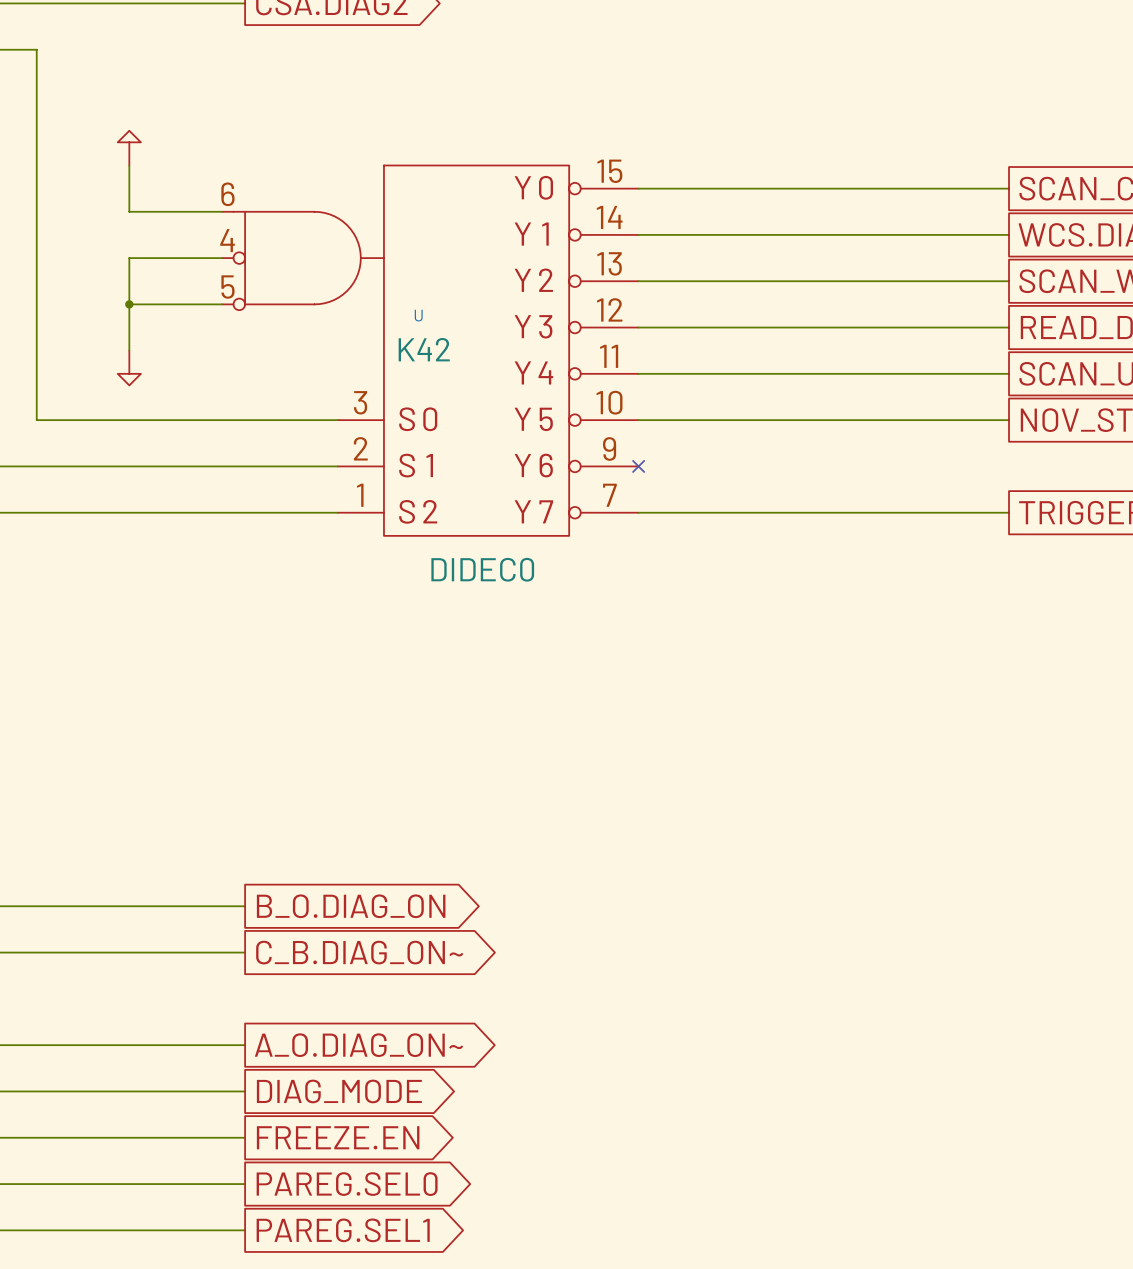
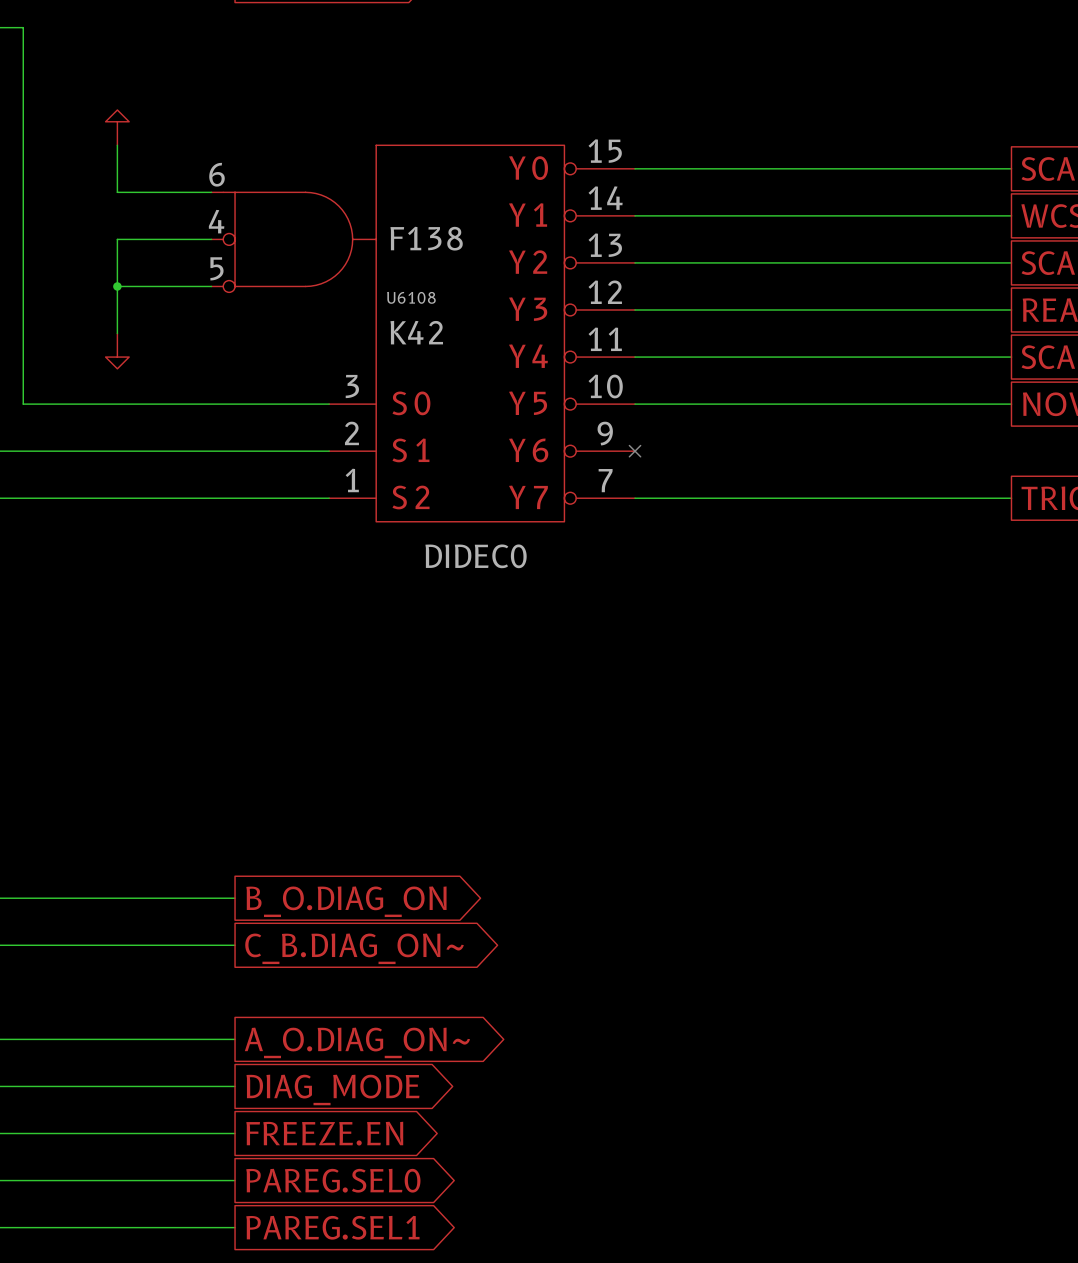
U value: none -> F138 (426, 238)
U name: U (418, 315) -> U6108 (411, 297)

